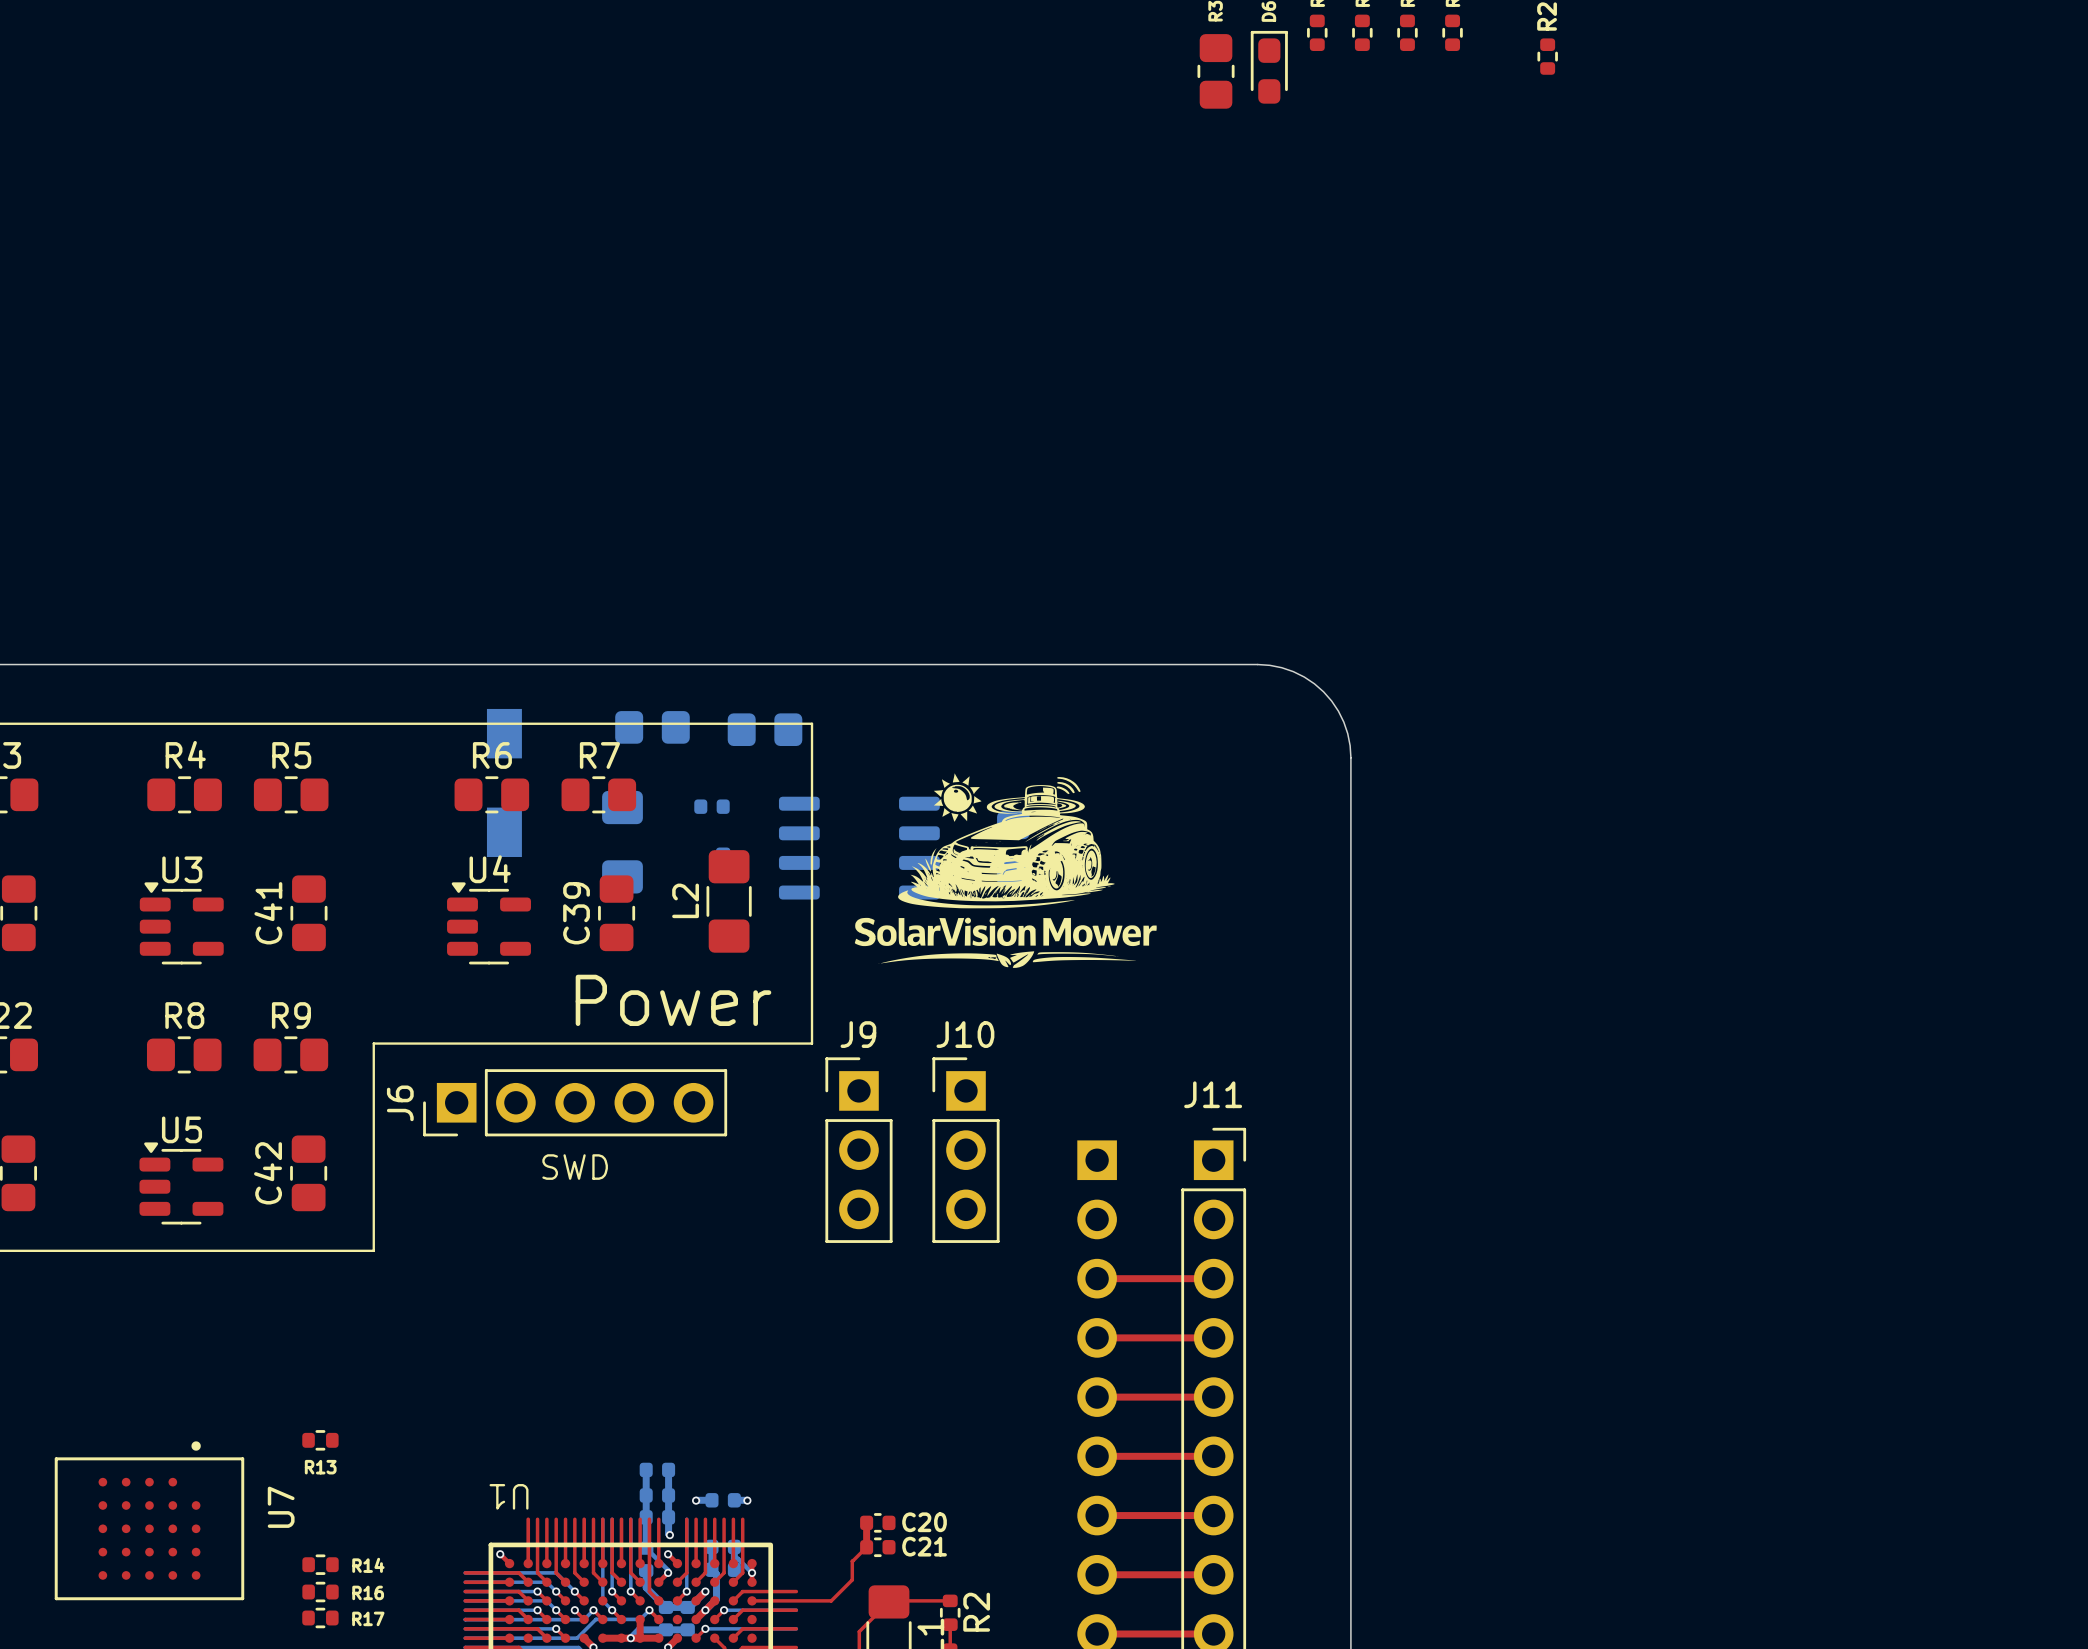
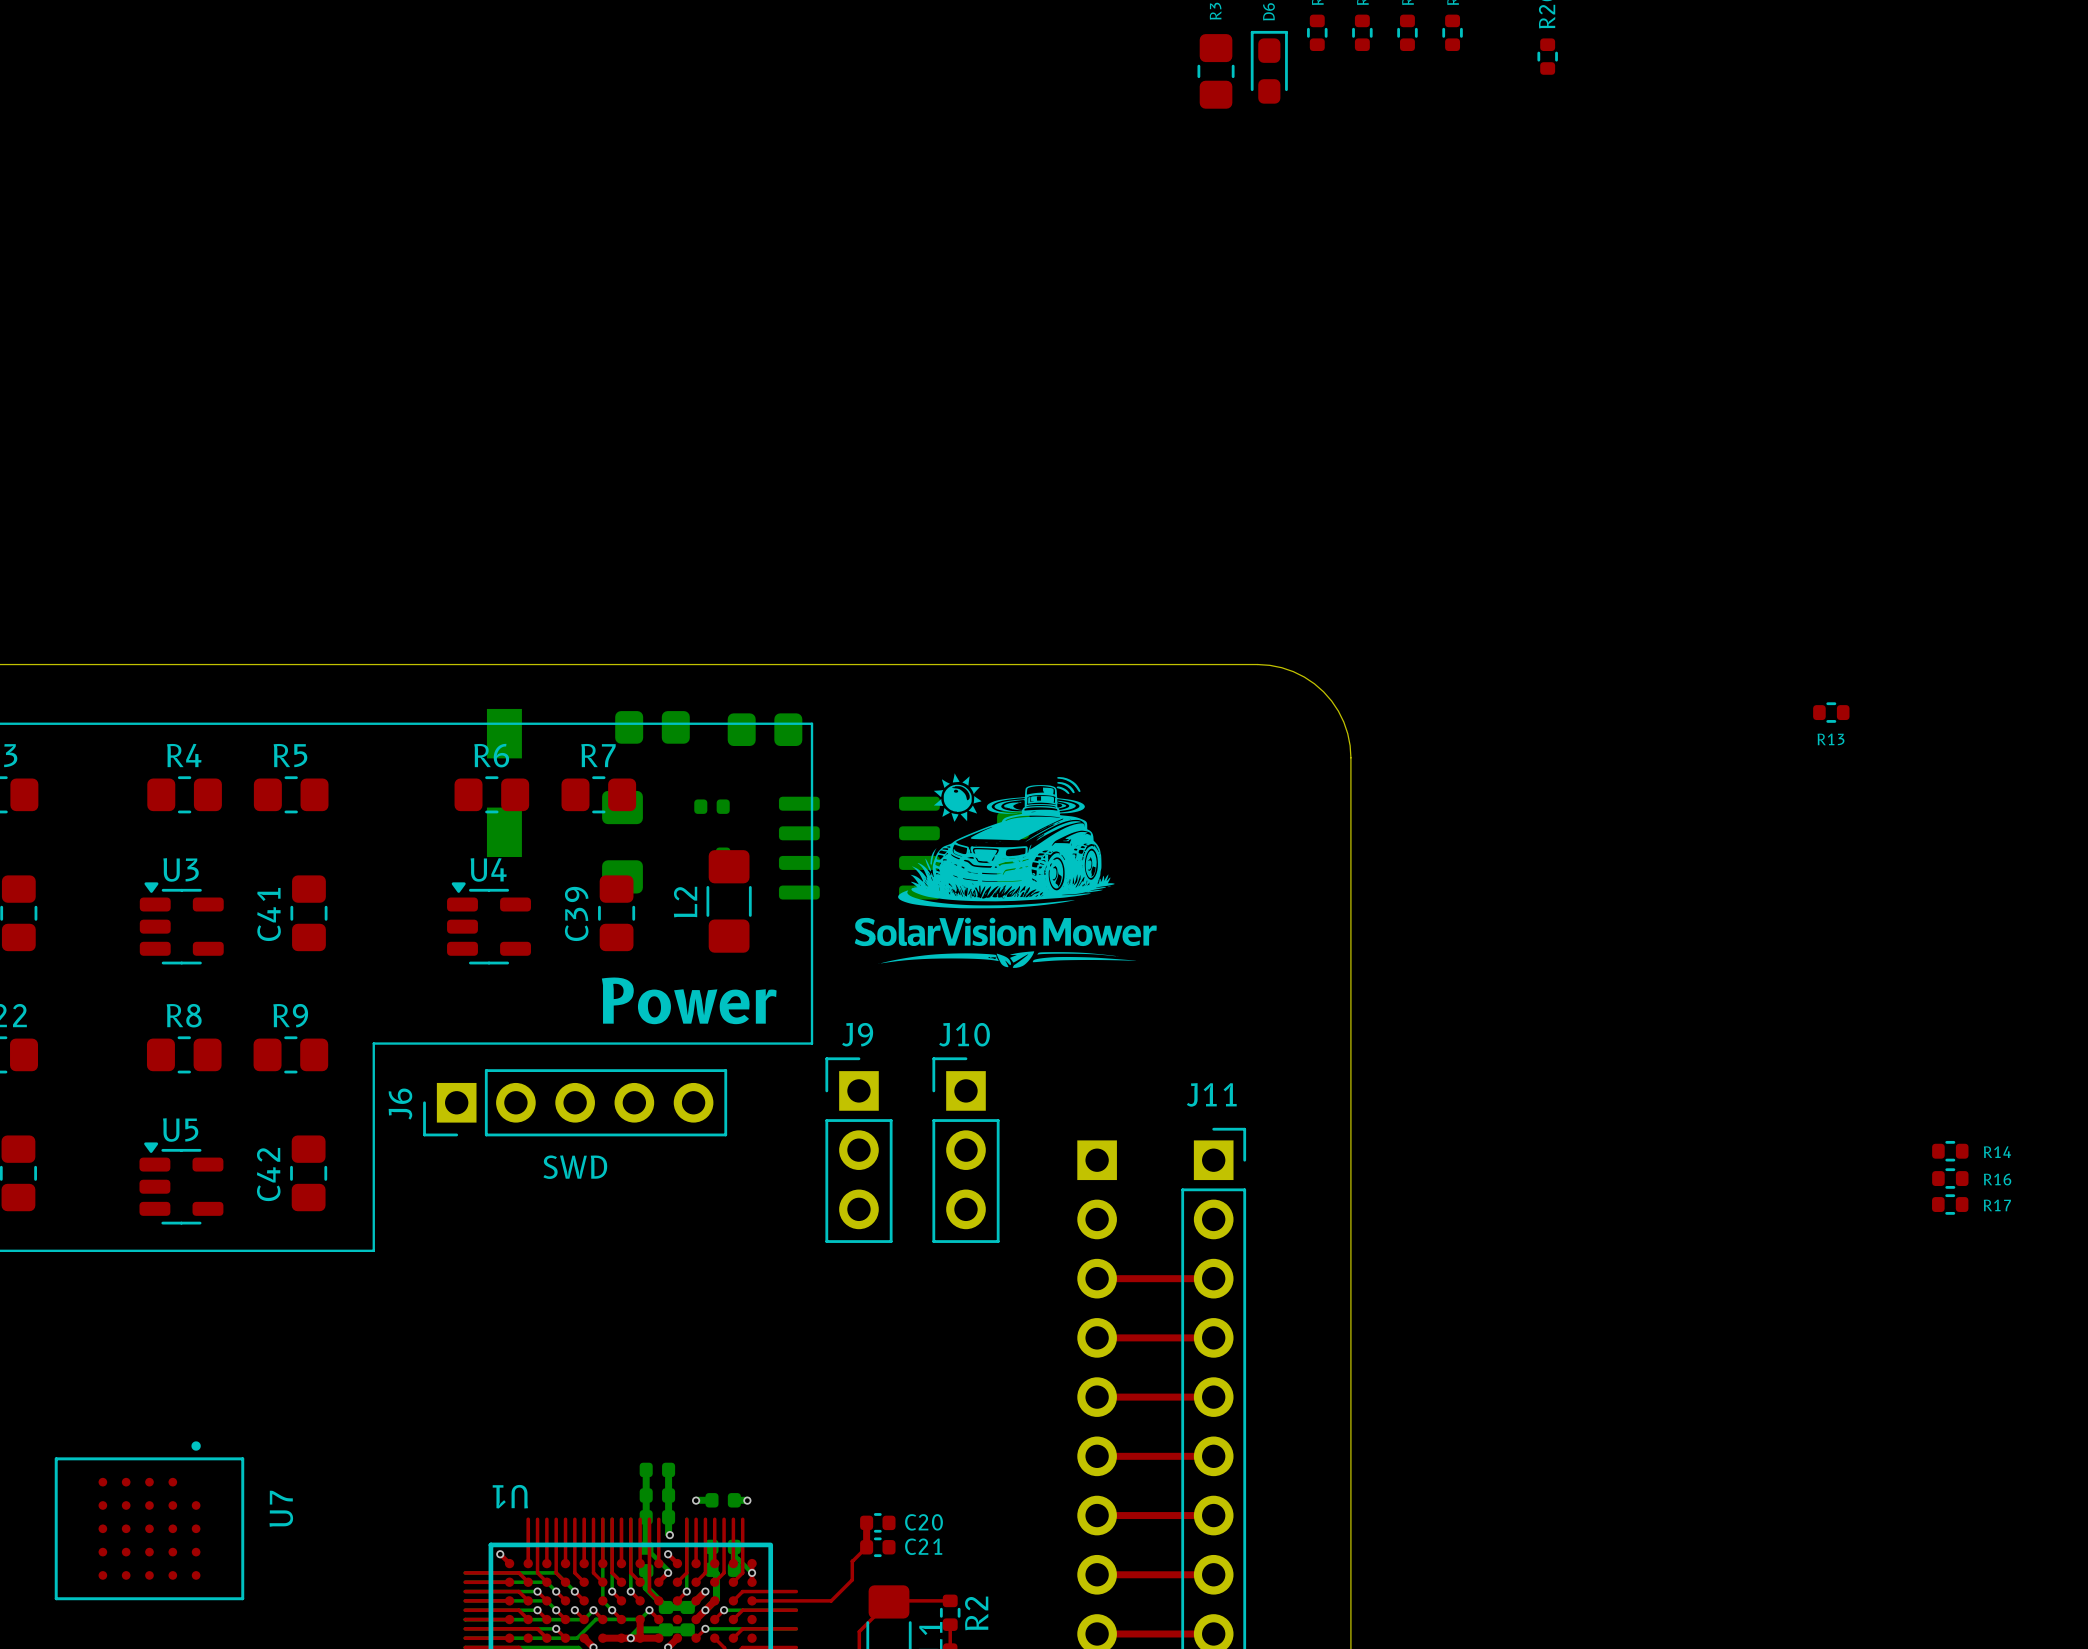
R13 position: (320, 1440) -> (1831, 712)
R14 position: (320, 1564) -> (1950, 1151)
R16 position: (320, 1592) -> (1950, 1178)
R17 position: (320, 1617) -> (1950, 1204)

